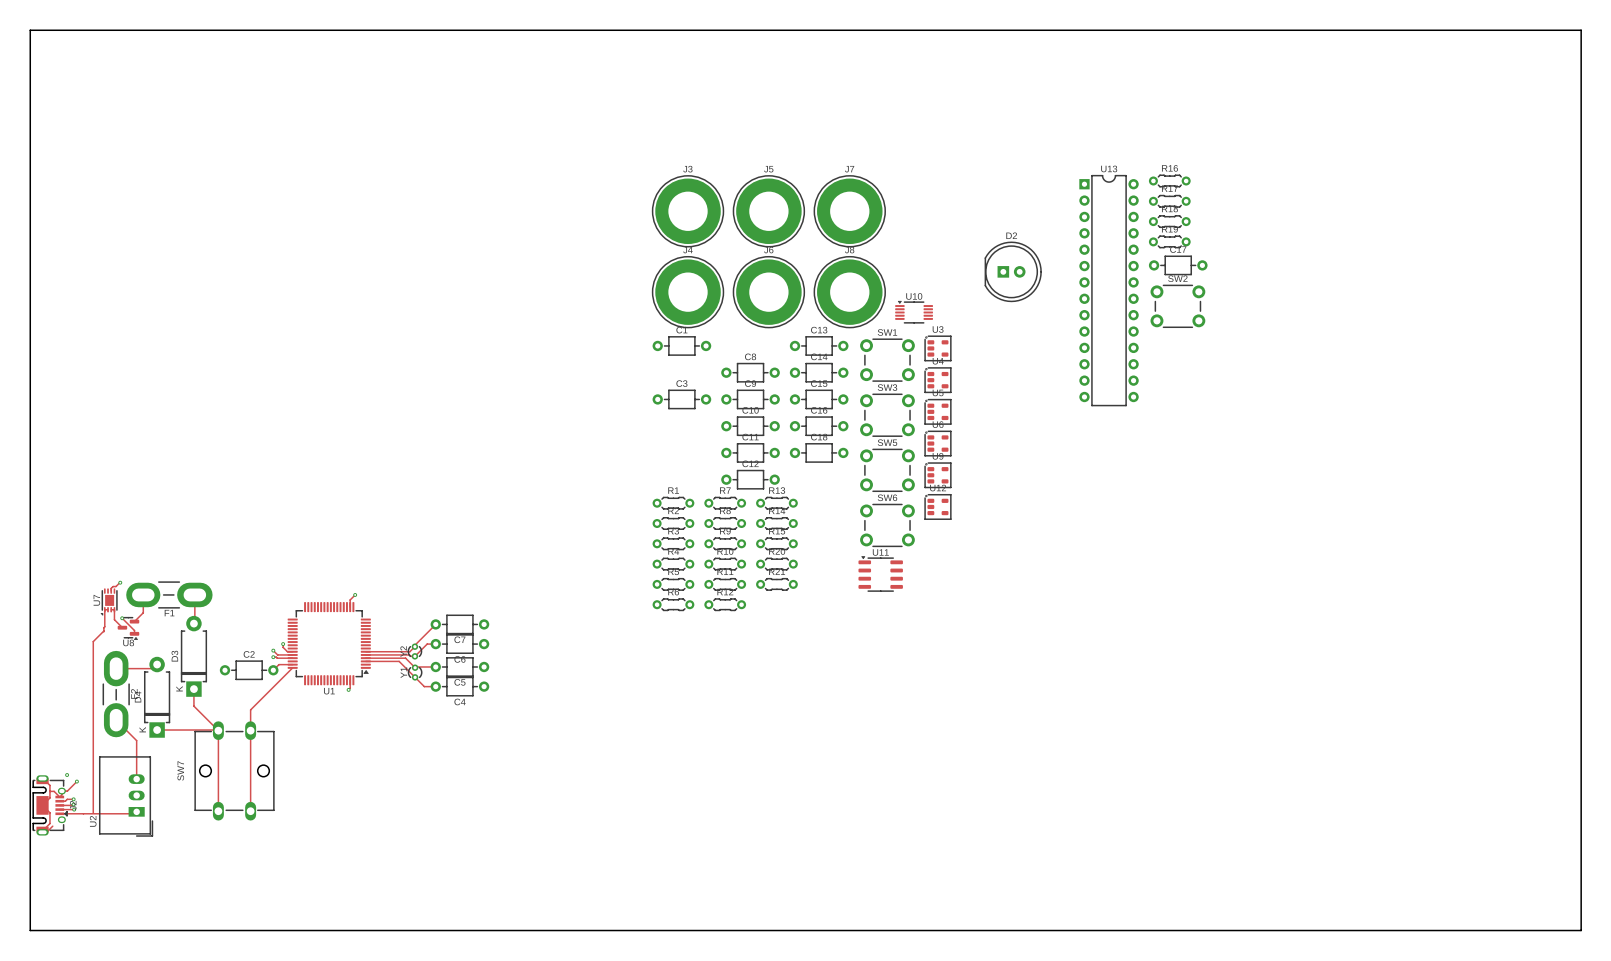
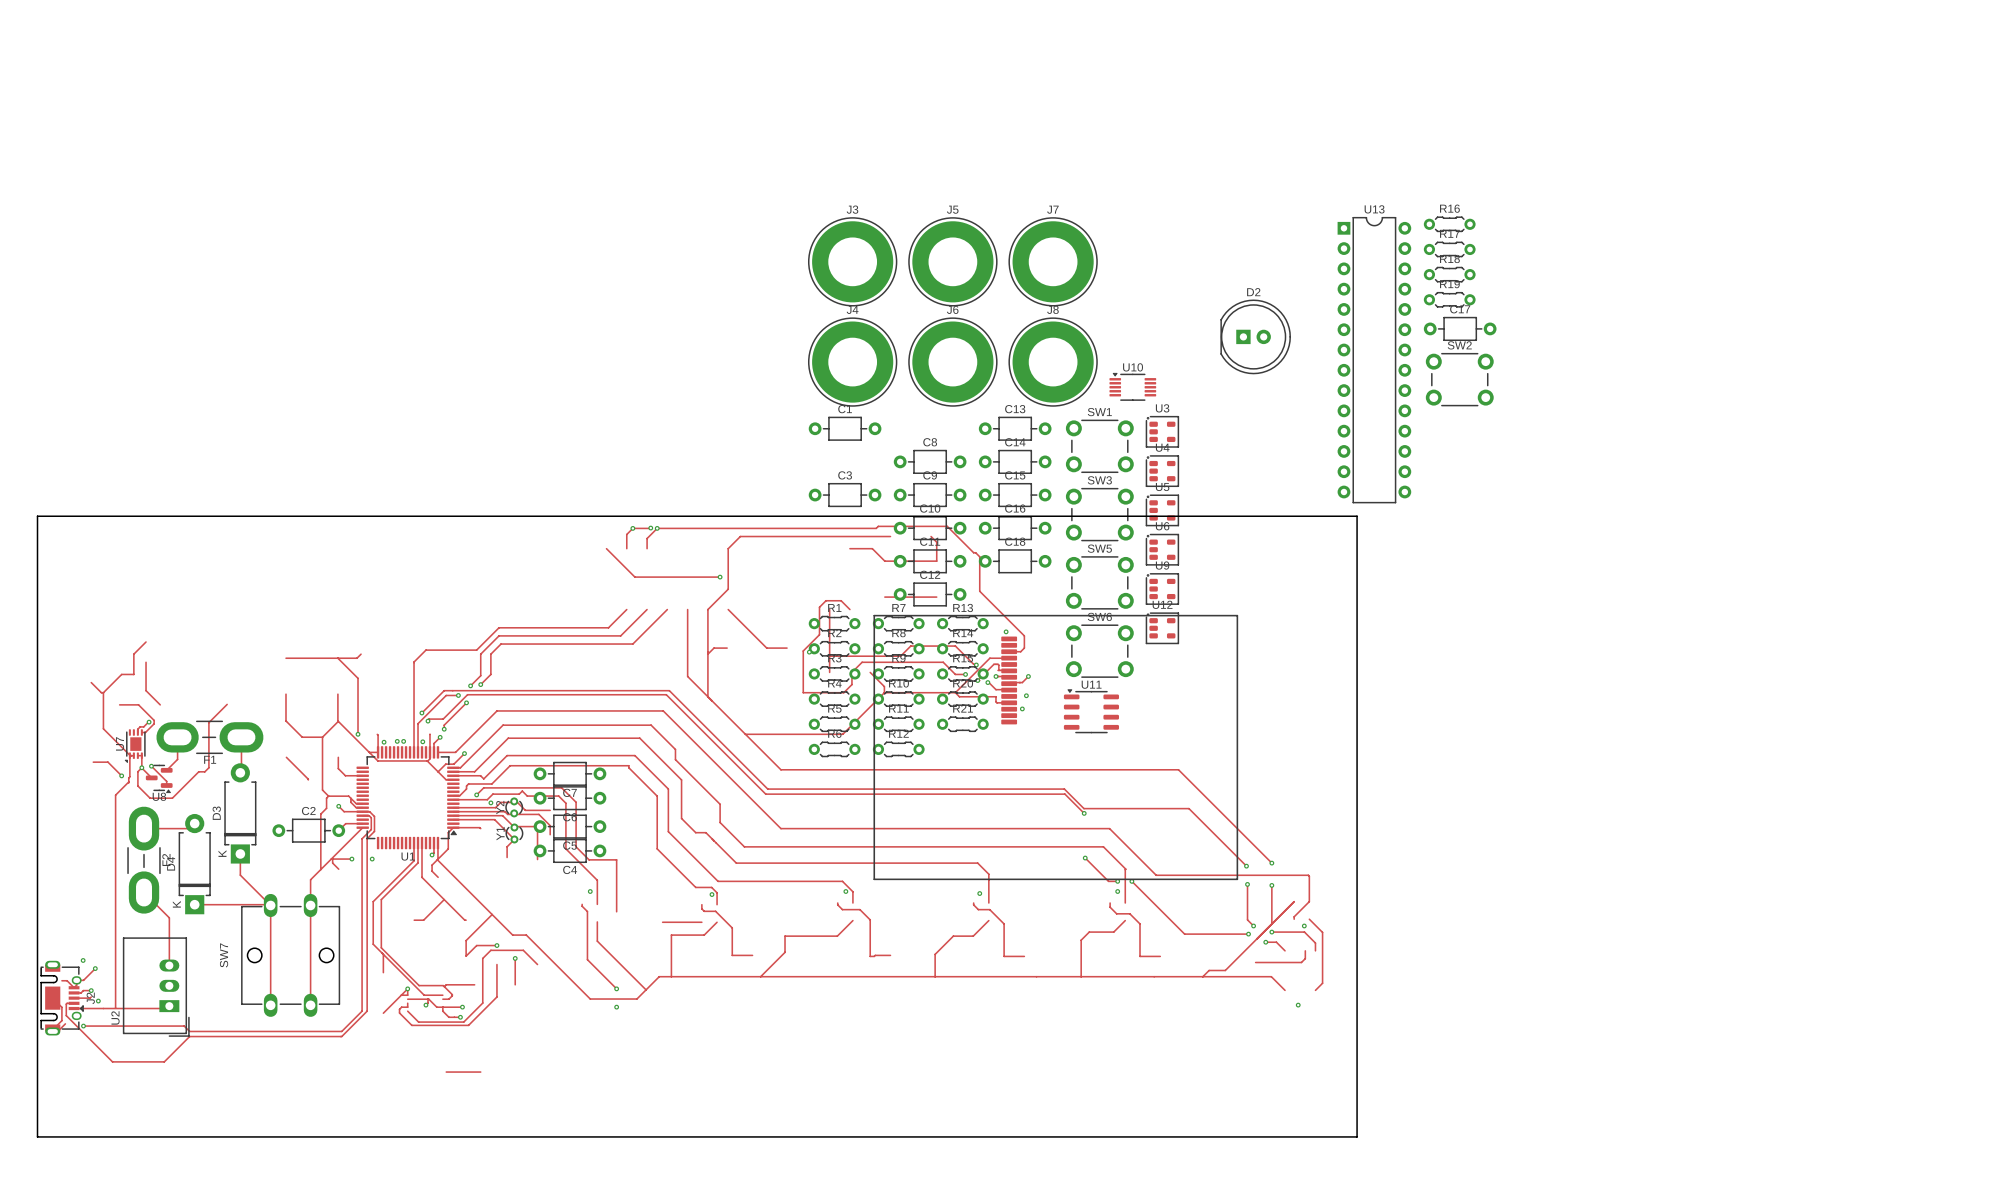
board edge: (30, 30) (1581, 30) (1581, 930) (30, 930) (30, 30) -> none
board edge: none -> (37, 516) (1357, 516) (1357, 1136) (37, 1136) (37, 516)
via: none -> (632, 528)
track: none -> (650, 528) (632, 528) (626, 534) (626, 548)
via: none -> (650, 528)
via: none -> (657, 528)
track: none -> (890, 536) (740, 536) (728, 548) (728, 589) (707, 609) (707, 696)
track: none -> (931, 536) (936, 542) (936, 561) (884, 561) (872, 548) (849, 548)
track: none -> (606, 548) (634, 577) (720, 577)
track: none -> (647, 548) (647, 538) (657, 528) (876, 528) (878, 526) (947, 526) (979, 556) (979, 591) (1024, 635) (1024, 648) (1020, 651) (1009, 651)
via: none -> (720, 577)
track: none -> (884, 597) (936, 597)
track: none -> (626, 609) (608, 627) (498, 627) (476, 650) (425, 650) (413, 662) (414, 752)
track: none -> (647, 609) (620, 635) (498, 635) (480, 654) (480, 675) (470, 685)
track: none -> (667, 609) (632, 644) (501, 644) (490, 654) (490, 674) (480, 684)
track: none -> (687, 609) (687, 676) (780, 769) (1178, 769) (1271, 863)
track: none -> (728, 609) (766, 648) (787, 648)
track: none -> (829, 609) (829, 672)
track: none -> (849, 609) (841, 600) (826, 600) (819, 607) (819, 634) (803, 650) (803, 692) (843, 692) (851, 684) (851, 672) (862, 662) (943, 662) (955, 674) (965, 674)
line: none -> (874, 615) (1237, 615) (1237, 879) (874, 879) (874, 615)
via: none -> (1006, 631)
drawing: none -> [1001, 636, 1018, 725]
track: none -> (146, 642) (133, 654) (133, 674)
track: none -> (727, 648) (714, 648) (707, 654)
via: none -> (809, 652)
track: none -> (361, 654) (356, 658) (286, 658)
track: none -> (829, 656) (900, 656) (910, 646) (955, 646) (976, 664)
track: none -> (337, 658) (358, 678) (358, 734)
track: none -> (1002, 658) (989, 658) (955, 692)
track: none -> (146, 662) (146, 690) (160, 704)
via: none -> (976, 664)
track: none -> (998, 670) (1002, 670)
track: none -> (998, 670) (998, 665) (993, 664) (977, 680) (979, 680)
track: none -> (870, 672) (884, 686) (884, 692)
track: none -> (133, 674) (121, 674) (103, 692)
via: none -> (965, 674)
track: none -> (995, 676) (1004, 676)
via: none -> (995, 676)
track: none -> (1028, 676) (1022, 682) (1010, 682)
via: none -> (1028, 676)
via: none -> (977, 680)
track: none -> (91, 682) (103, 692)
track: none -> (988, 682) (995, 689) (1004, 689)
via: none -> (987, 682)
via: none -> (480, 684)
via: none -> (470, 685)
track: none -> (103, 692) (103, 728) (130, 755)
track: none -> (884, 692) (955, 692)
track: none -> (884, 692) (842, 734) (745, 734)
track: none -> (955, 692) (959, 696) (995, 696) (996, 702) (1004, 702)
track: none -> (286, 694) (286, 720) (302, 737) (322, 737)
track: none -> (337, 694) (337, 720) (377, 760) (427, 760) (429, 758) (429, 734)
track: none -> (458, 695) (446, 695) (418, 723) (418, 752)
via: none -> (458, 695)
via: none -> (1026, 695)
track: none -> (466, 702) (444, 725) (444, 729)
via: none -> (466, 702)
track: none -> (119, 704) (138, 704) (154, 720) (154, 723) (145, 732) (141, 732)
track: none -> (227, 704) (208, 722) (208, 767) (204, 771) (198, 771) (172, 798) (150, 798) (137, 786) (137, 771) (141, 767)
via: none -> (1022, 708)
track: none -> (421, 713) (444, 690) (669, 690) (767, 789) (1064, 789) (1083, 808) (1188, 808) (1246, 866)
via: none -> (421, 713)
track: none -> (427, 721) (428, 719) (443, 719) (467, 694) (666, 694) (765, 794) (1064, 794) (1084, 813)
via: none -> (427, 721)
track: none -> (338, 721) (322, 737)
via: none -> (444, 729)
via: none -> (358, 734)
track: none -> (377, 734) (378, 752) (369, 752)
track: none -> (322, 737) (322, 790) (328, 796)
via: none -> (384, 742)
via: none -> (397, 741)
via: none -> (403, 741)
via: none -> (422, 741)
track: none -> (437, 752) (455, 752) (496, 710) (663, 710) (780, 828) (1109, 828) (1156, 875) (1308, 875) (1309, 901) (1294, 916) (1294, 919)
track: none -> (464, 753) (453, 764) (445, 764) (438, 771)
via: none -> (464, 753)
track: none -> (286, 757) (308, 779)
track: none -> (338, 757) (338, 768) (345, 775) (362, 775)
track: none -> (93, 762) (107, 762) (121, 775)
track: none -> (427, 760) (446, 779) (453, 779)
via: none -> (141, 767)
track: none -> (453, 767) (460, 767) (503, 725) (651, 725) (675, 749) (675, 759) (720, 804) (720, 822) (744, 846) (1103, 846) (1125, 869) (1125, 903)
track: none -> (453, 771) (474, 771) (508, 738) (639, 738) (681, 779) (681, 818) (695, 832) (705, 832) (736, 863) (977, 863) (988, 874) (988, 903)
track: (435, 624) (409, 651) (399, 651) -> (550, 810) (525, 810) (517, 802) (500, 802) (495, 807)
track: none -> (453, 775) (480, 775) (483, 778) (507, 755) (634, 755) (668, 789) (668, 831) (718, 881) (842, 881) (852, 891) (852, 903)
via: none -> (121, 775)
track: none -> (476, 794) (483, 787) (561, 787) (576, 802) (576, 846) (589, 859) (616, 859) (616, 911)
via: none -> (476, 794)
track: none -> (328, 796) (348, 796) (356, 803) (362, 803)
track: none -> (328, 796) (326, 798) (326, 808) (320, 814) (320, 869)
track: none -> (453, 795) (459, 795) (468, 784) (491, 784) (510, 765) (628, 765) (657, 796) (657, 848) (695, 887) (711, 887) (717, 892) (717, 904)
via: (283, 644) -> none
track: (435, 644) (427, 644) (414, 656) (407, 654) -> (550, 834) (550, 825) (538, 814) (507, 814) (504, 811)
track: none -> (453, 799) (487, 799) (492, 794) (519, 794) (522, 791) (527, 796) (558, 796) (565, 803) (565, 848) (597, 880) (597, 904)
via: none -> (490, 802)
via: none -> (1084, 813)
track: (273, 657) (292, 658) -> (83, 1026) (184, 1026) (189, 1031) (341, 1031) (362, 1011) (362, 838) (371, 829) (371, 817) (369, 815) (362, 815)
via: (273, 657) -> none
track: none -> (540, 826) (537, 829) (537, 859)
track: none -> (480, 828) (453, 827) (448, 832) (448, 848) (432, 865) (432, 871) (438, 877)
track: (415, 677) (424, 686) (435, 686) -> (514, 839) (507, 846) (507, 857)
track: none -> (414, 843) (414, 860) (373, 901) (373, 944) (424, 995) (442, 995)
track: none -> (418, 843) (418, 862) (381, 899) (381, 947) (419, 985) (443, 985) (452, 995) (448, 999) (442, 999)
track: none -> (422, 843) (422, 877) (466, 920)
track: none -> (437, 843) (437, 859)
track: none -> (1085, 858) (1108, 881) (1117, 881)
via: none -> (1085, 858)
track: none -> (331, 858) (351, 859)
track: none -> (332, 859) (332, 863) (338, 869)
via: none -> (351, 859)
via: none -> (372, 859)
track: none -> (437, 859) (512, 935) (526, 935) (590, 999) (636, 999) (659, 976) (1271, 976) (1285, 990)
via: none -> (1271, 863)
via: none -> (1246, 866)
via: none -> (1117, 881)
track: none -> (1131, 881) (1184, 934) (1248, 934)
via: none -> (1131, 881)
track: none -> (1247, 884) (1247, 919) (1253, 925)
via: none -> (1247, 884)
track: none -> (1271, 885) (1271, 923)
via: none -> (1271, 885)
via: none -> (590, 891)
via: none -> (845, 891)
via: none -> (1117, 891)
via: none -> (711, 894)
via: none -> (979, 893)
track: none -> (444, 899) (423, 920) (414, 920)
track: none -> (1294, 901) (1225, 970) (1209, 970) (1202, 976)
track: none -> (837, 903) (842, 909) (859, 909) (870, 919) (870, 956) (890, 955)
track: none -> (973, 903) (978, 909) (989, 909) (1004, 923) (1004, 956) (1024, 956)
track: none -> (1110, 903) (1110, 907) (1116, 913) (1129, 913) (1140, 923) (1140, 956) (1160, 956)
track: none -> (582, 904) (587, 911) (587, 959) (616, 988)
track: none -> (701, 904) (704, 911) (715, 911) (732, 927) (732, 955) (752, 955)
track: none -> (492, 914) (466, 940) (466, 956) (476, 945) (496, 945)
track: none -> (1309, 919) (1322, 932) (1322, 983) (1315, 990)
track: none -> (852, 920) (837, 936) (785, 936) (785, 952) (760, 976)
track: none -> (988, 920) (973, 936) (953, 936) (935, 954) (935, 976)
track: none -> (1125, 920) (1113, 932) (1089, 932) (1081, 940) (1081, 976)
track: none -> (597, 921) (597, 941) (646, 989)
track: none -> (662, 922) (701, 922)
track: none -> (717, 922) (704, 935) (671, 935) (671, 976)
via: none -> (1253, 925)
via: none -> (1304, 925)
track: none -> (1271, 932) (1304, 932) (1315, 943) (1315, 950)
via: none -> (1271, 932)
via: none -> (1248, 934)
track: none -> (1265, 942) (1276, 942) (1285, 950)
via: none -> (1265, 942)
via: none -> (496, 945)
track: none -> (1305, 950) (1305, 958) (1301, 962) (1255, 962)
track: none -> (383, 954) (383, 972)
track: none -> (515, 958) (515, 984)
via: none -> (515, 958)
track: none -> (496, 964) (496, 996) (468, 1025) (411, 1025) (399, 1013) (401, 1007) (407, 1007) (407, 1003)
track: none -> (537, 964) (523, 950) (490, 950) (482, 958) (482, 1003) (463, 1022) (418, 1022) (407, 1011)
track: (45, 781) (49, 785) (49, 797) (42, 805) -> none
track: none -> (474, 984) (446, 984) (444, 986)
via: none -> (407, 988)
via: none -> (616, 988)
track: none -> (401, 995) (407, 995) (407, 988) (383, 1013)
via: (73, 804) -> none
track: none -> (407, 999) (428, 999) (436, 1007) (462, 1007)
track: none -> (427, 999) (425, 1005)
via: none -> (98, 1001)
track: (59, 809) (74, 809) -> (74, 1003) (66, 1004) (66, 1015) (112, 1061) (164, 1061) (189, 1036) (341, 1036) (367, 1011) (367, 838) (374, 831) (374, 816) (369, 811) (362, 811)
via: (74, 809) -> none
via: none -> (425, 1005)
via: none -> (1298, 1005)
track: none -> (442, 1007) (442, 1011) (448, 1017) (460, 1017)
via: none -> (462, 1007)
via: none -> (616, 1007)
via: none -> (460, 1017)
via: none -> (83, 1026)
track: none -> (446, 1072) (480, 1072)

